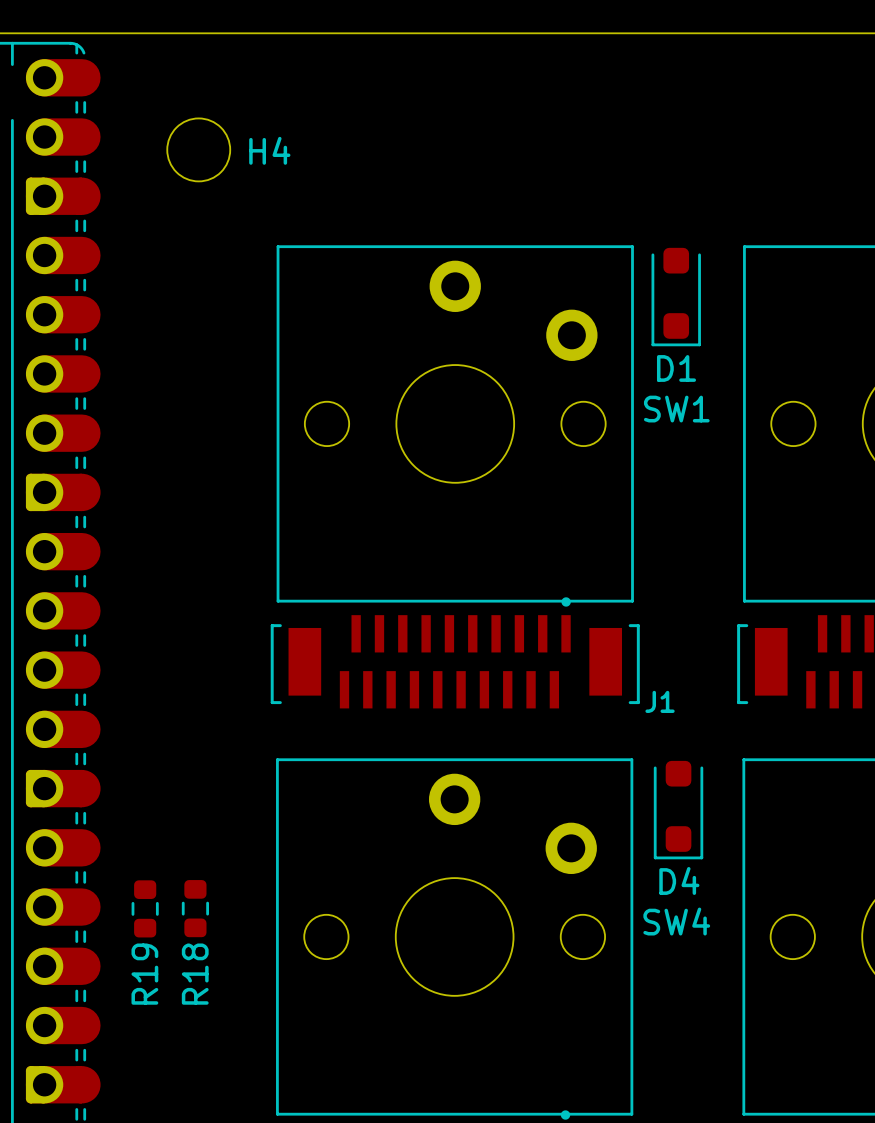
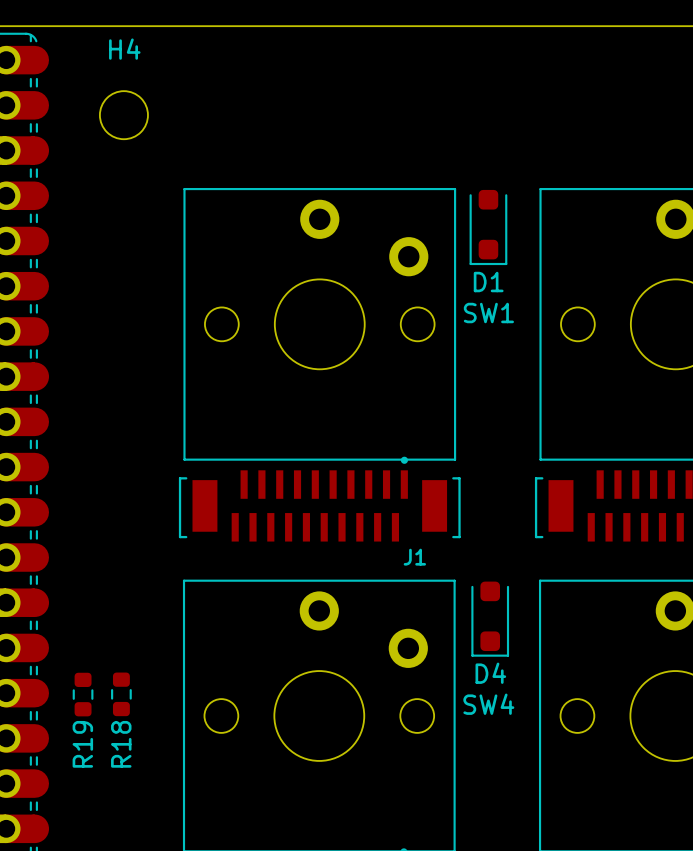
H4 name position: H4 (269, 150) -> H4 (124, 49)
J1 name position: J1 (660, 701) -> J1 (414, 557)

